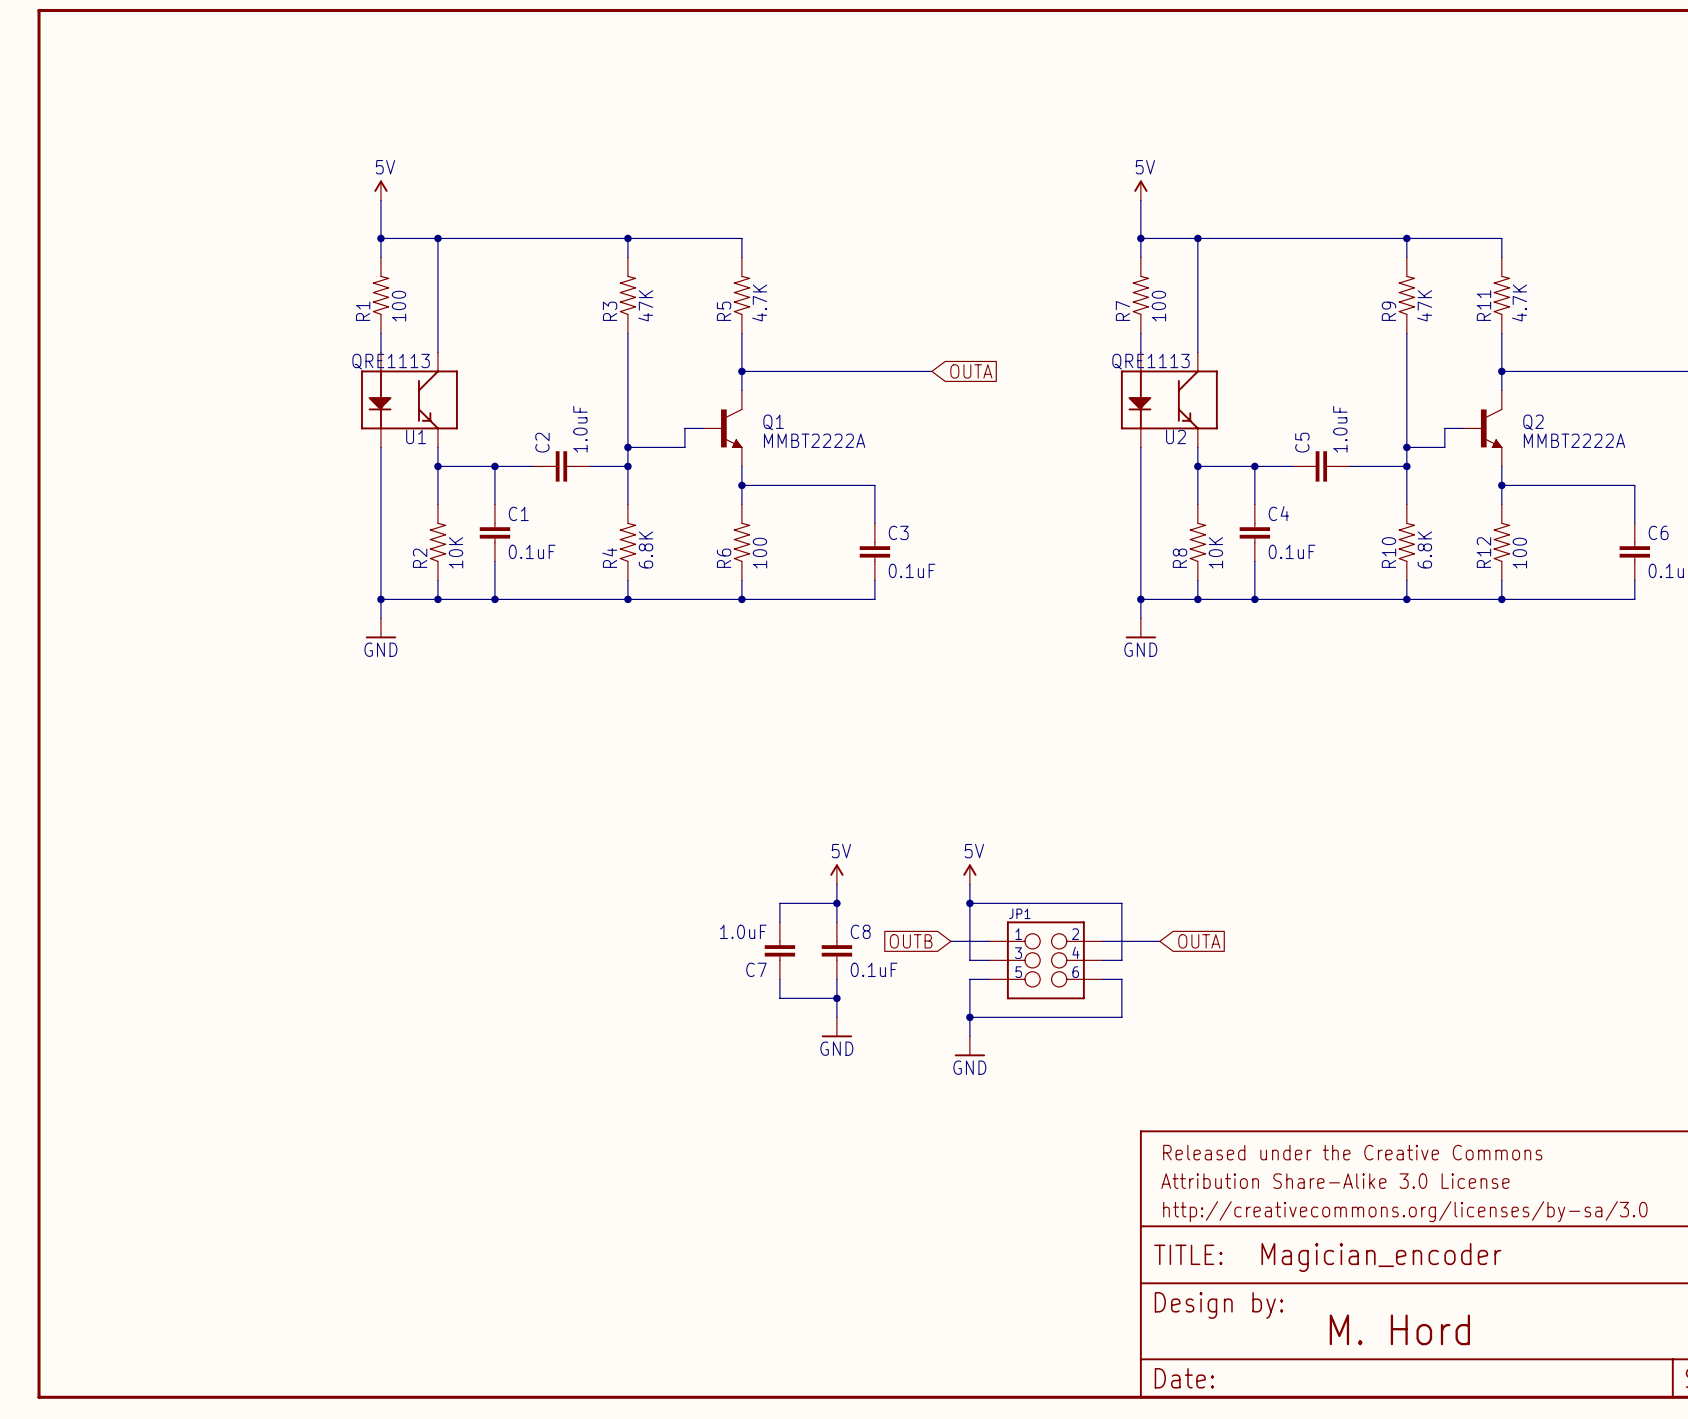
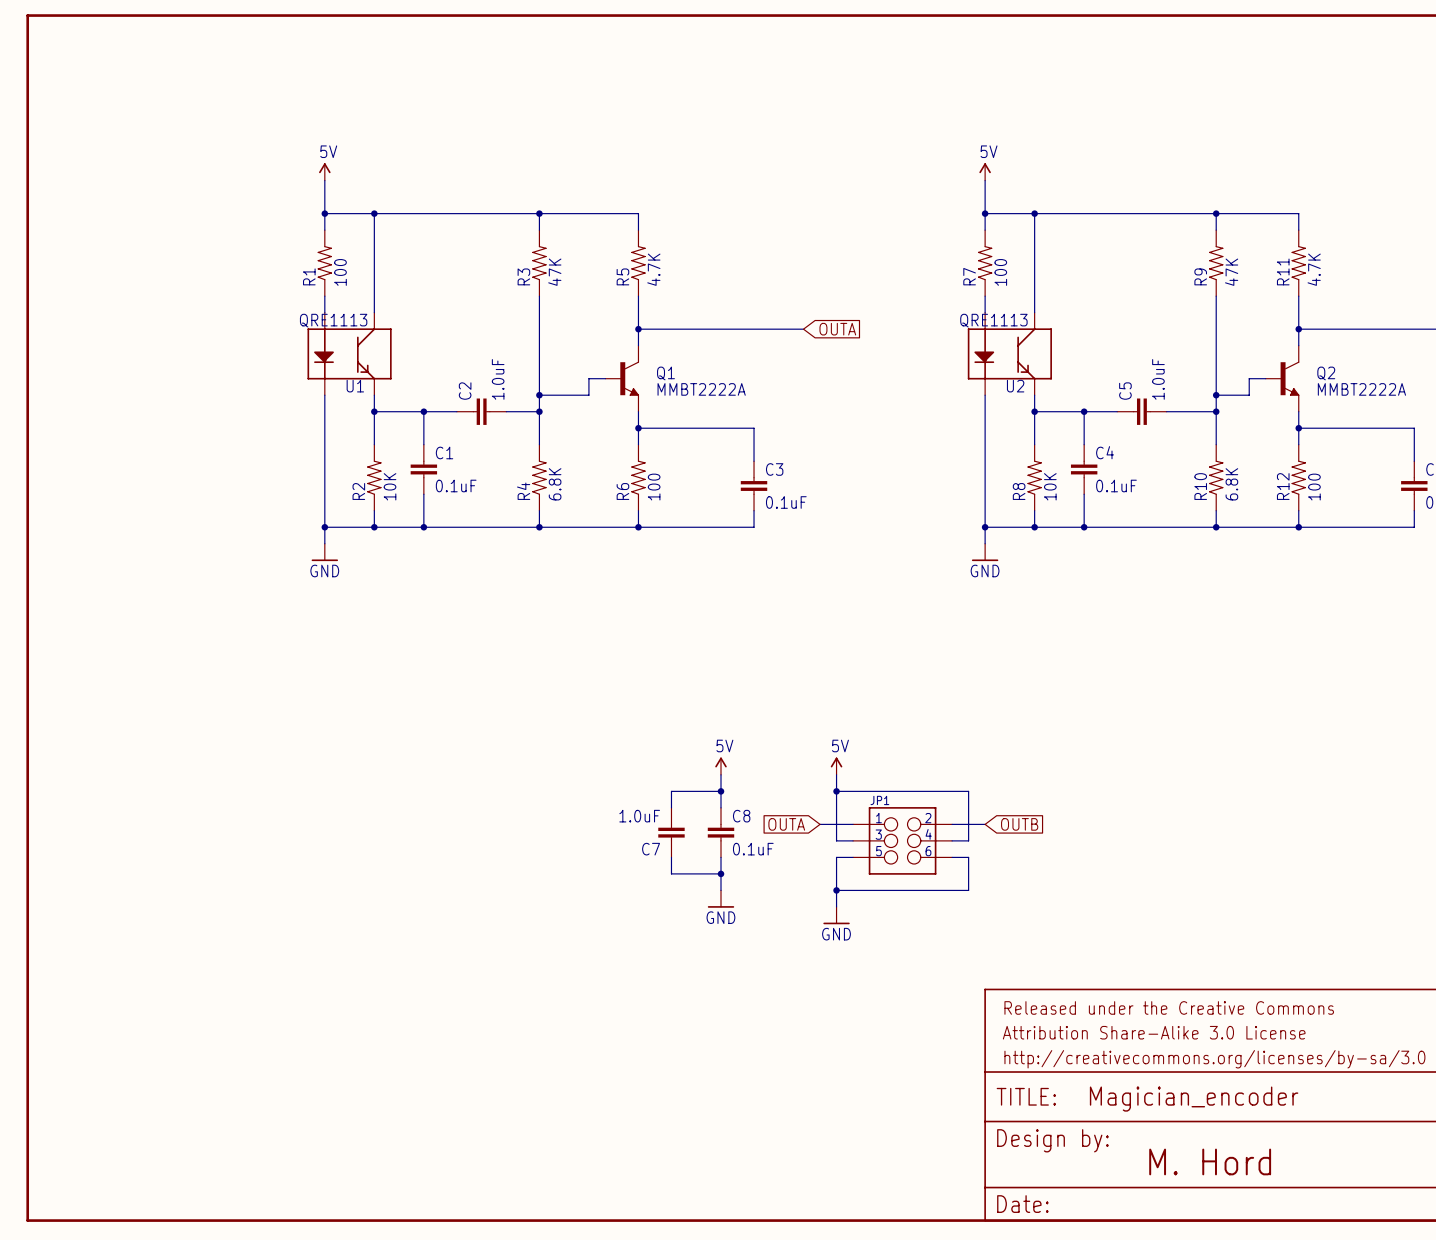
global label: OUTB (911, 941) -> OUTA (786, 824)
wire: (1140, 941) (1159, 941) -> none
global label: OUTA (1199, 941) -> OUTB (1019, 824)

